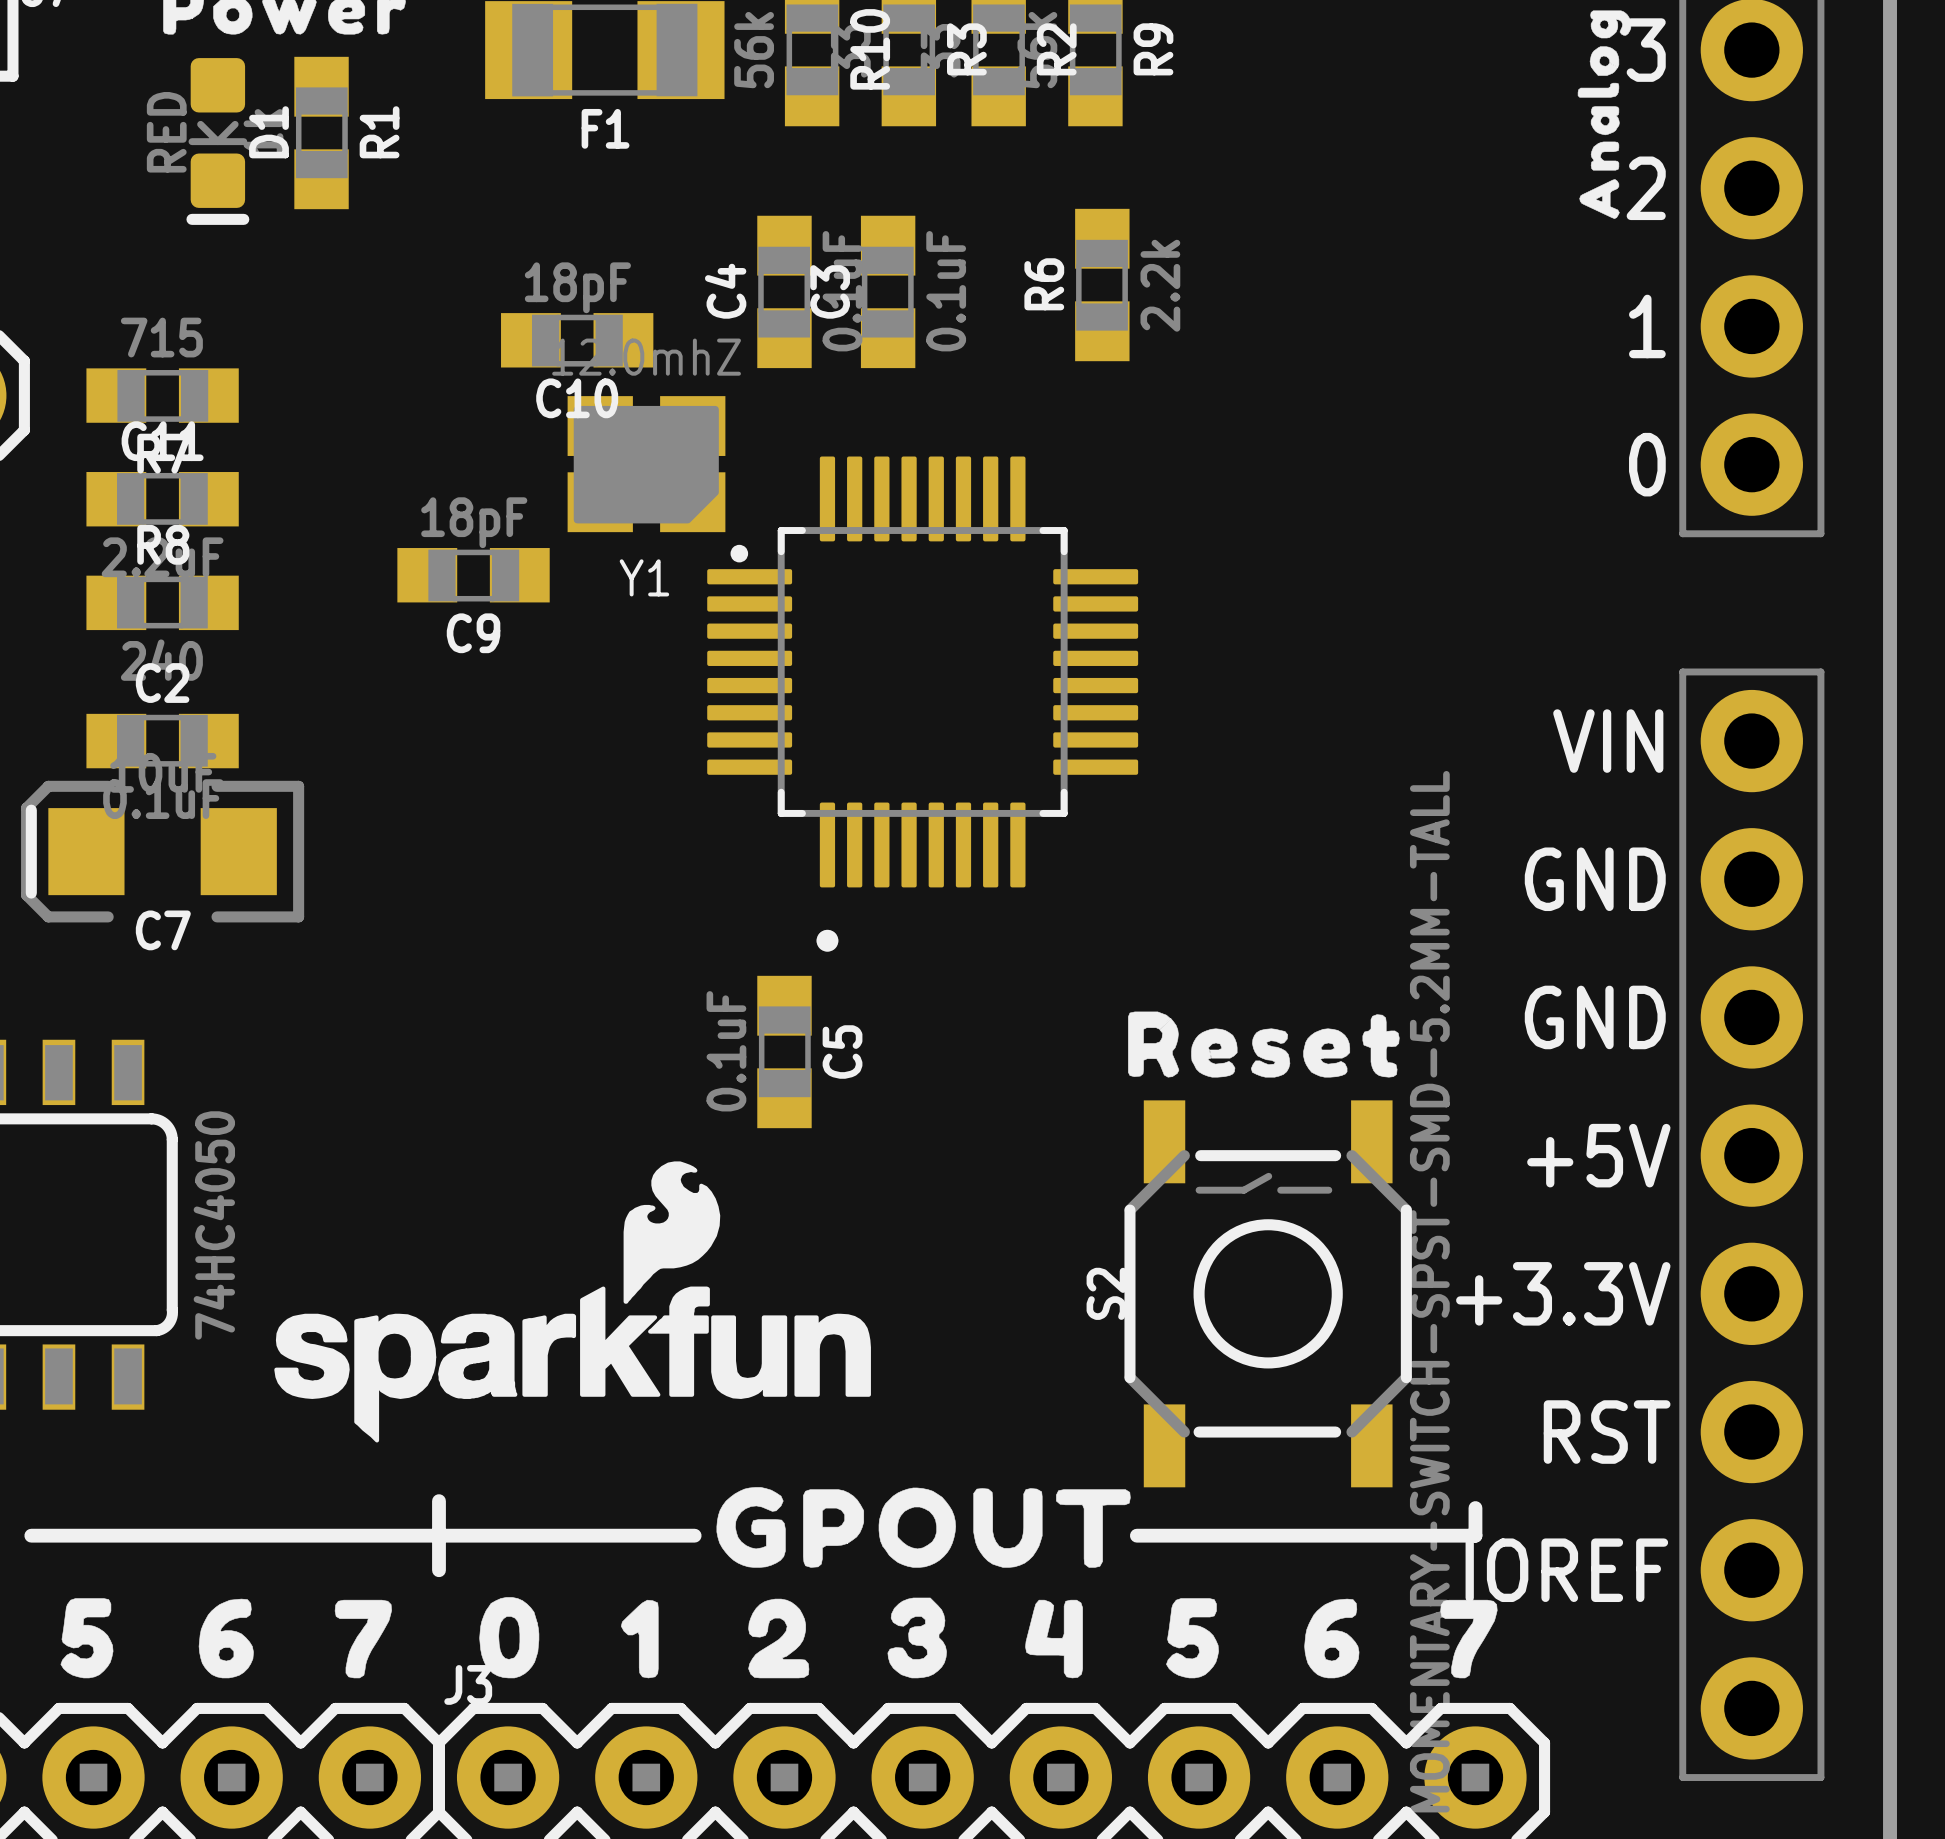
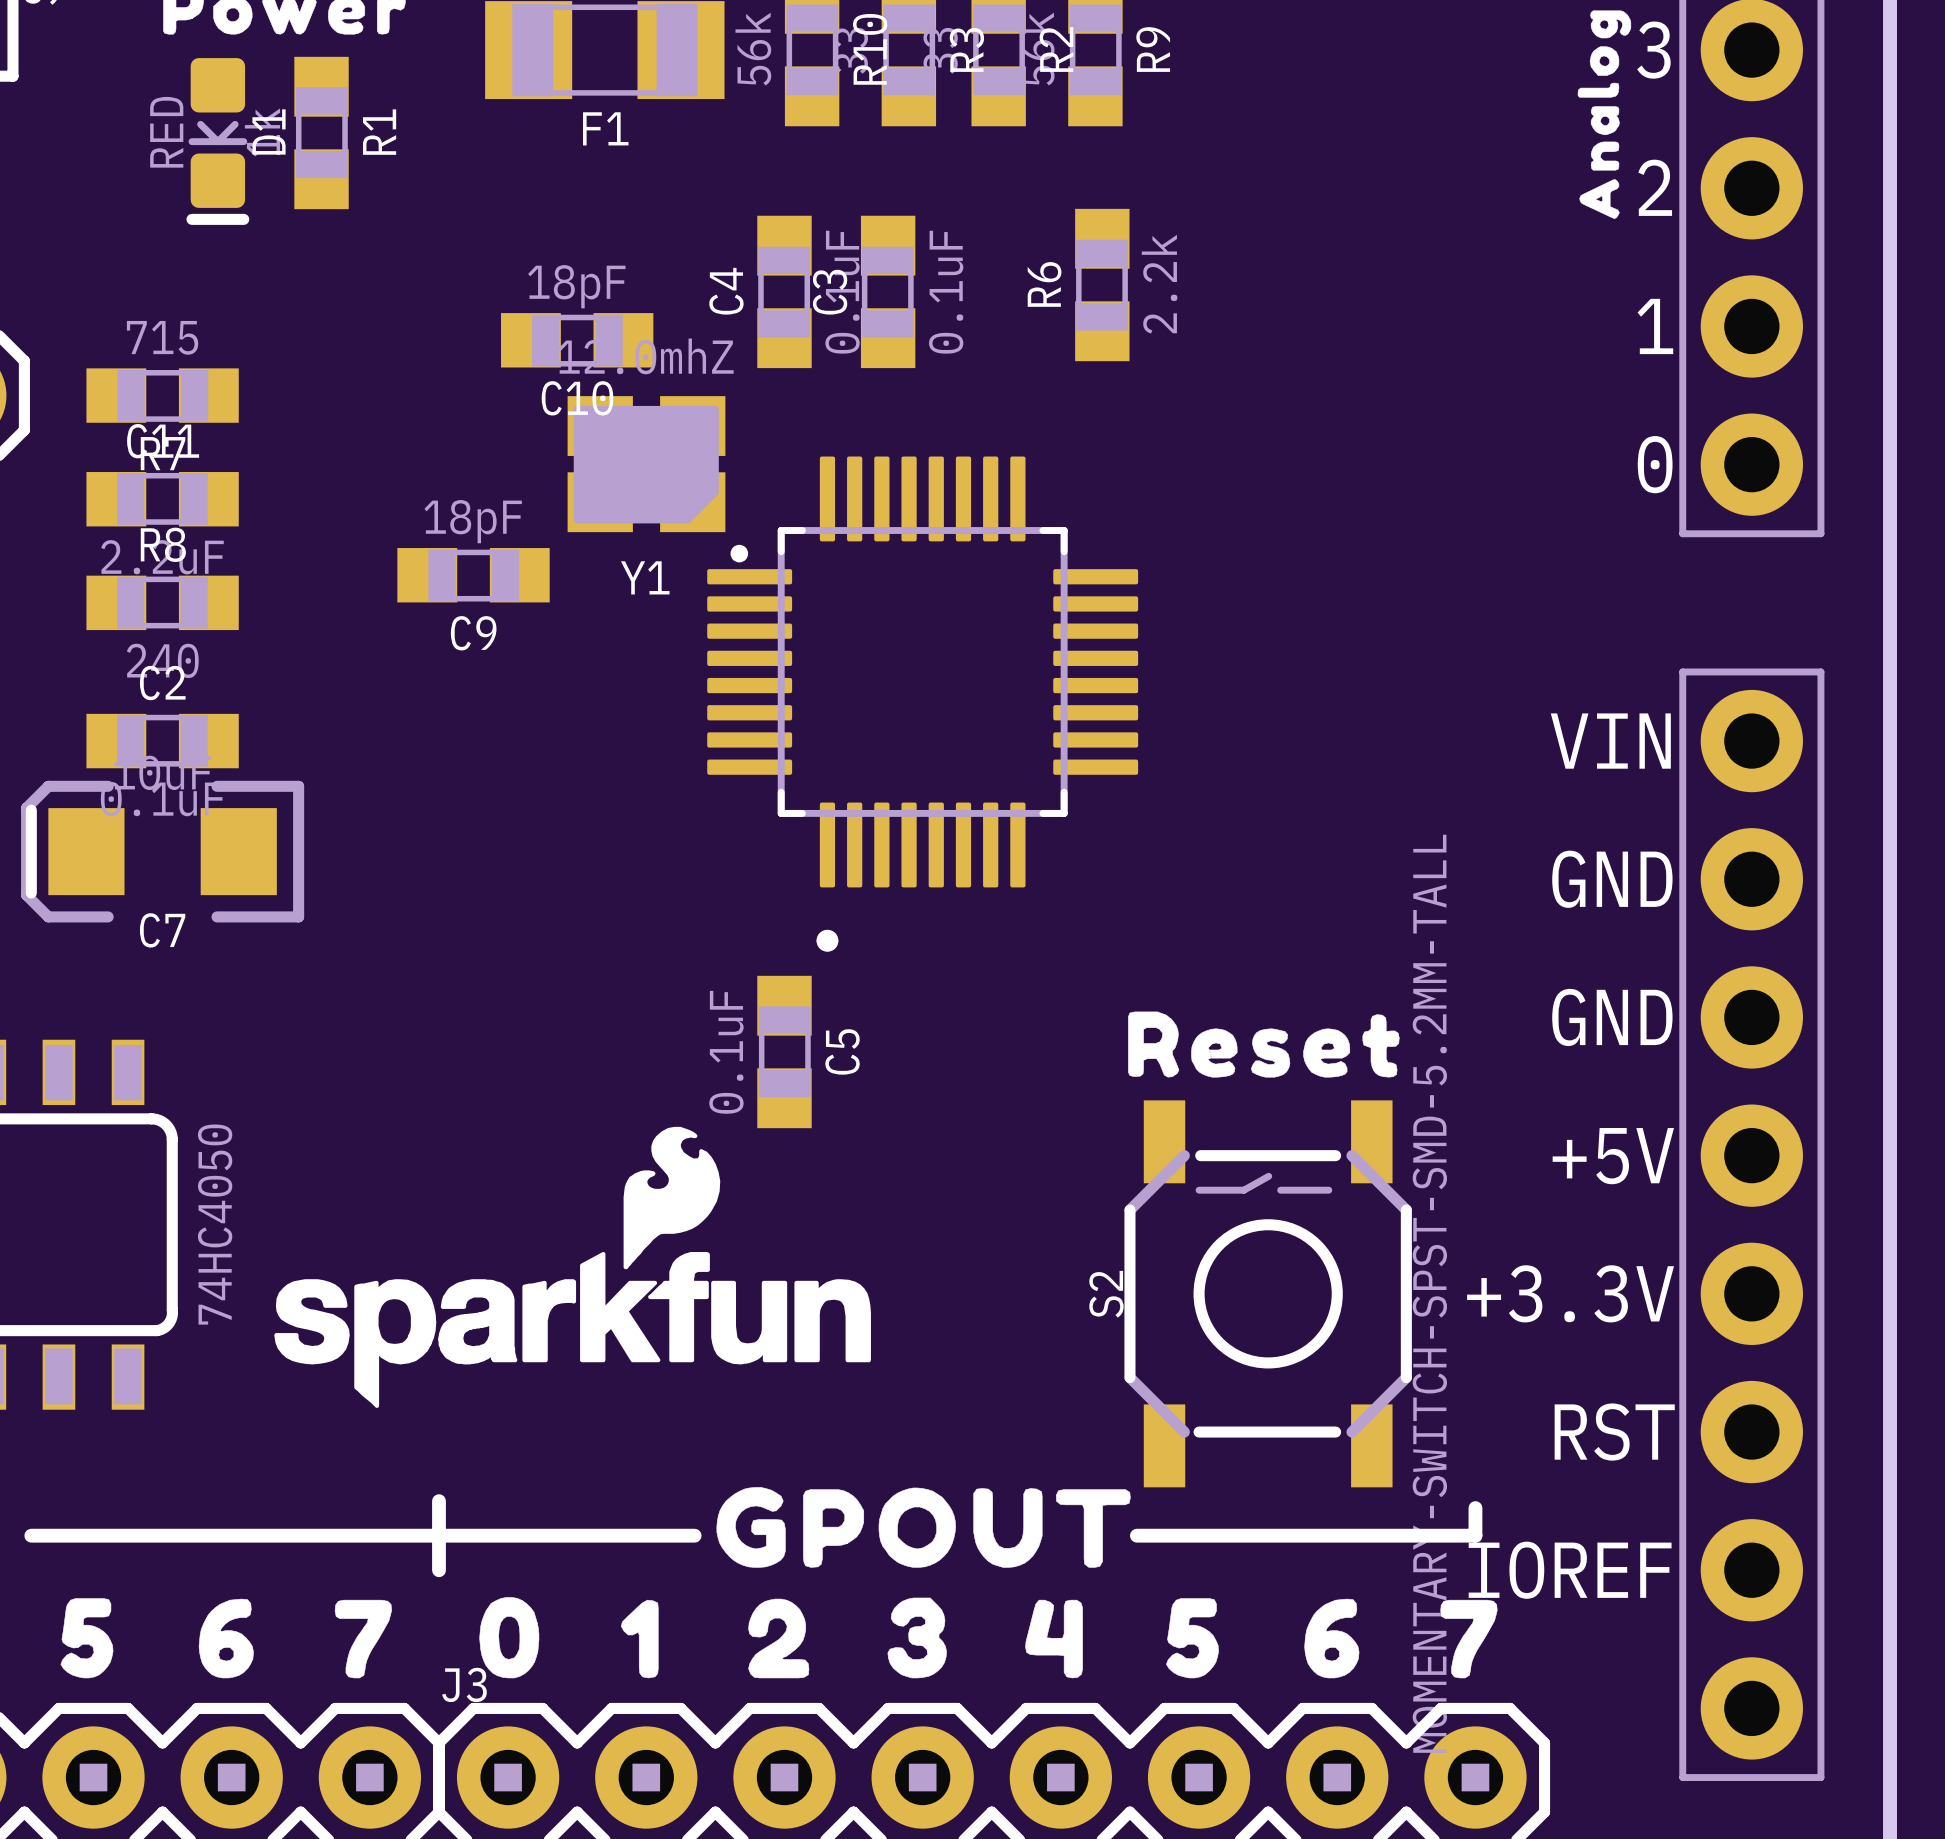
drawing position: (572, 1301) -> (572, 1267)

